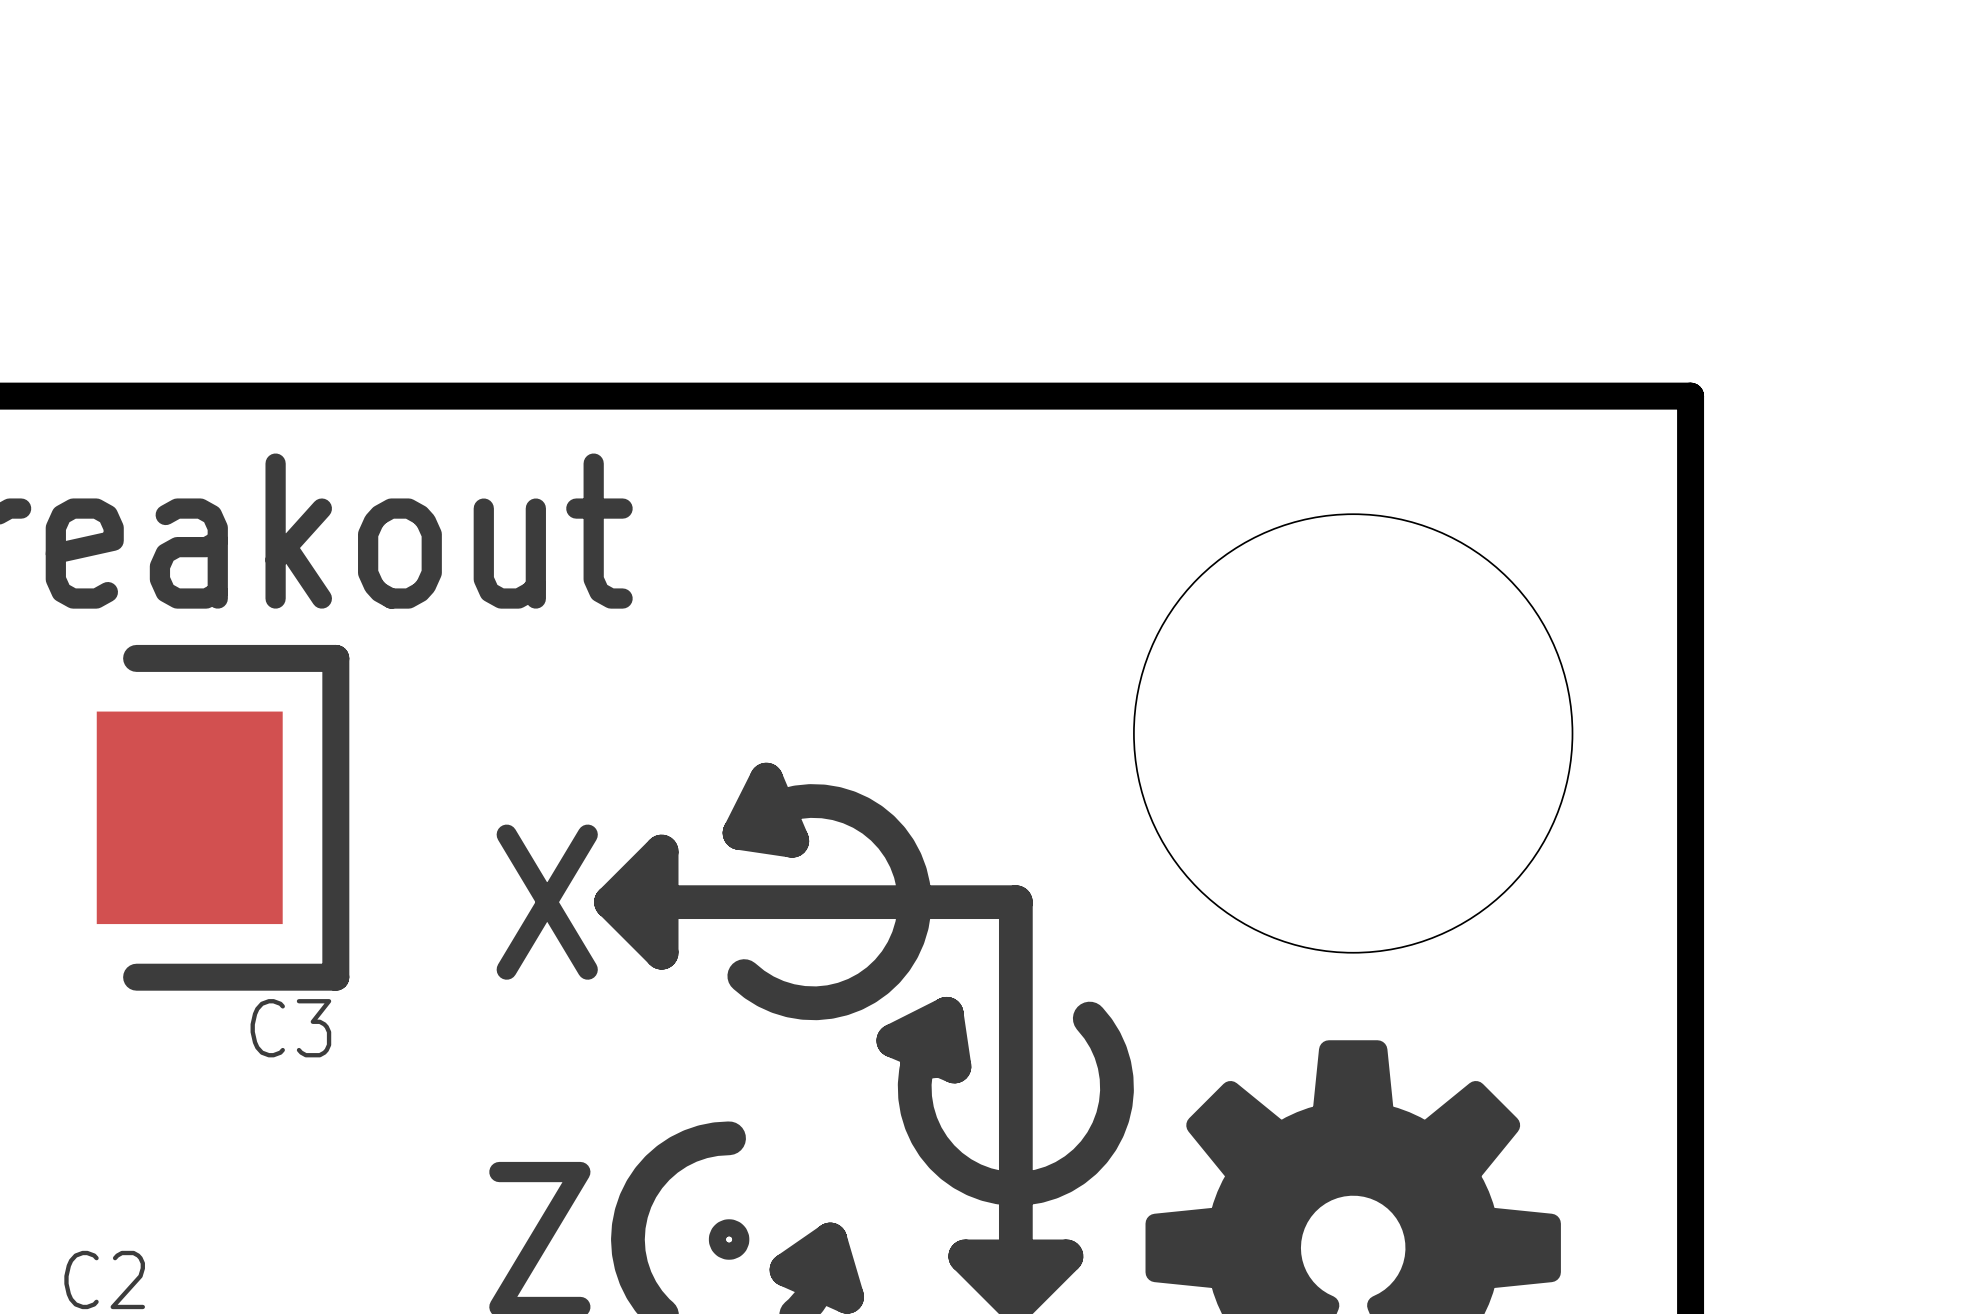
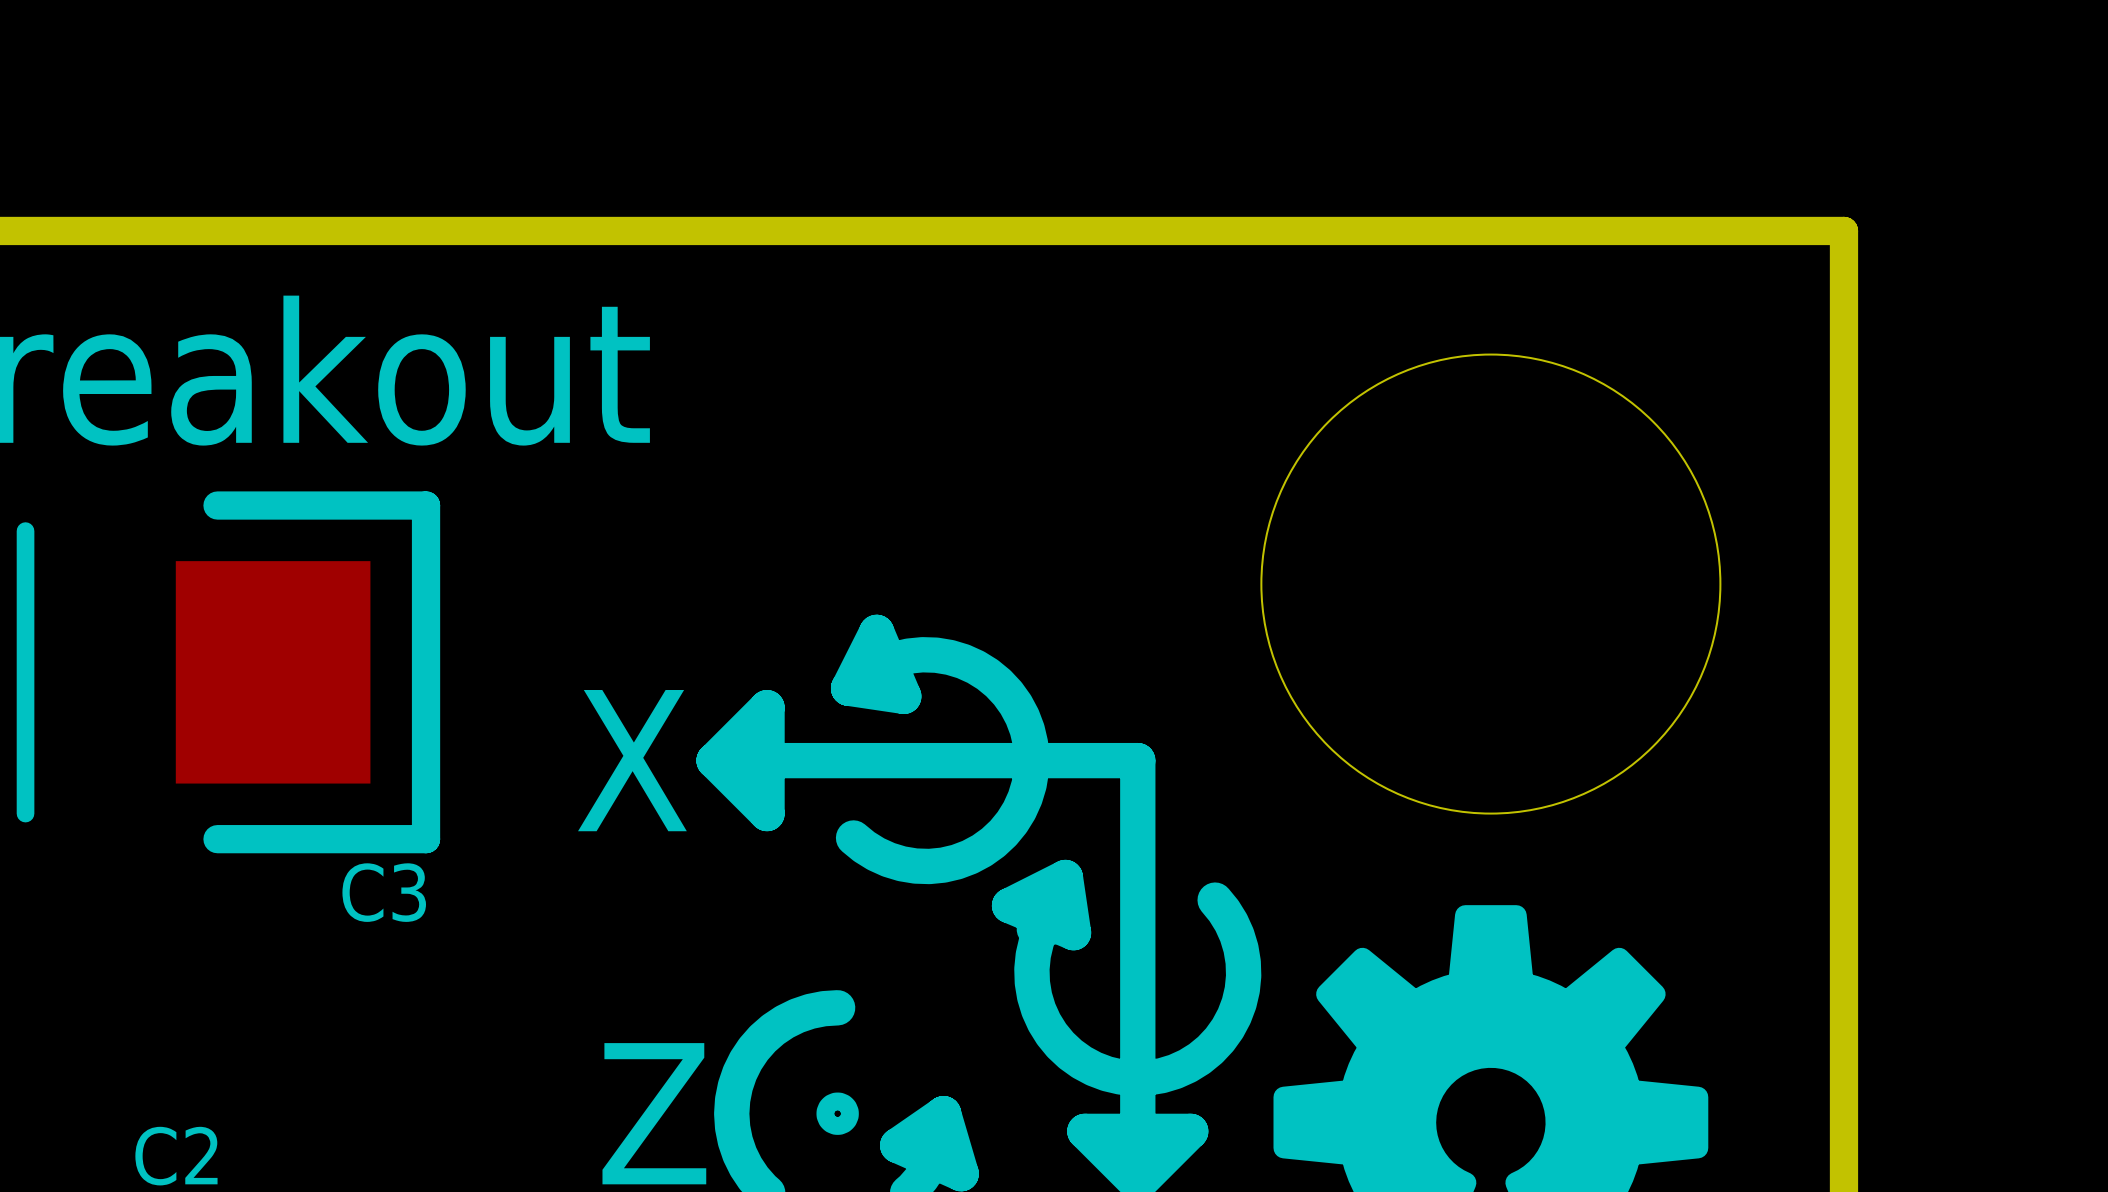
line: (946, 1013) (929, 1034) (919, 1058) (916, 1071) (915, 1097) (921, 1123) (933, 1146) (951, 1165) (962, 1173) (986, 1184) (1012, 1188) (1038, 1186) (1051, 1182) (1074, 1169) (1094, 1151) (1108, 1129) (1115, 1104) (1116, 1077) (1110, 1052) (1098, 1028) (1089, 1018) -> (1065, 895) (1047, 916) (1036, 941) (1033, 955) (1032, 982) (1038, 1009) (1051, 1034) (1070, 1054) (1081, 1062) (1107, 1073) (1134, 1078) (1161, 1075) (1175, 1071) (1199, 1058) (1219, 1039) (1234, 1016) (1242, 989) (1243, 962) (1236, 935) (1223, 910) (1215, 900)

